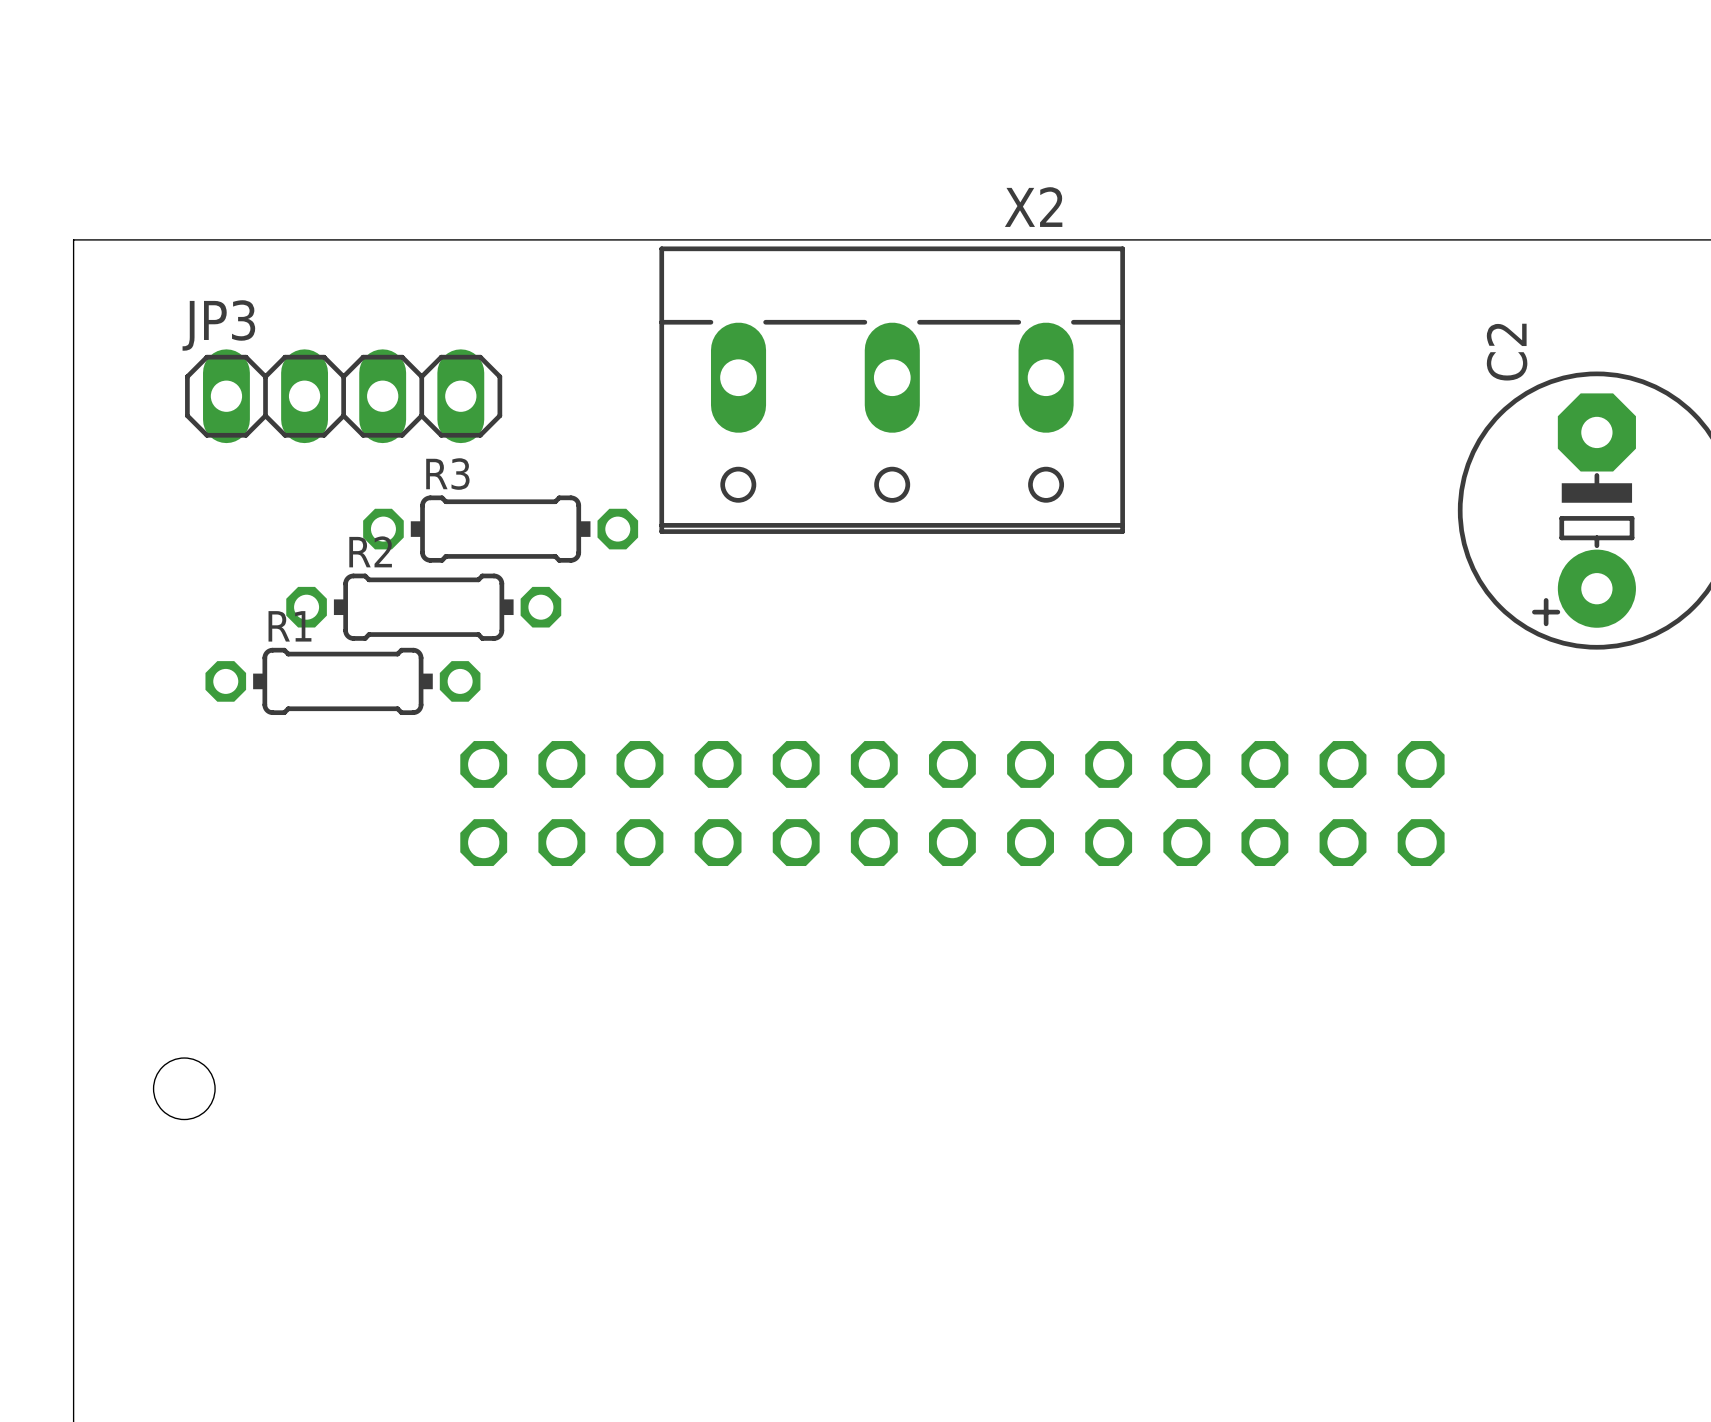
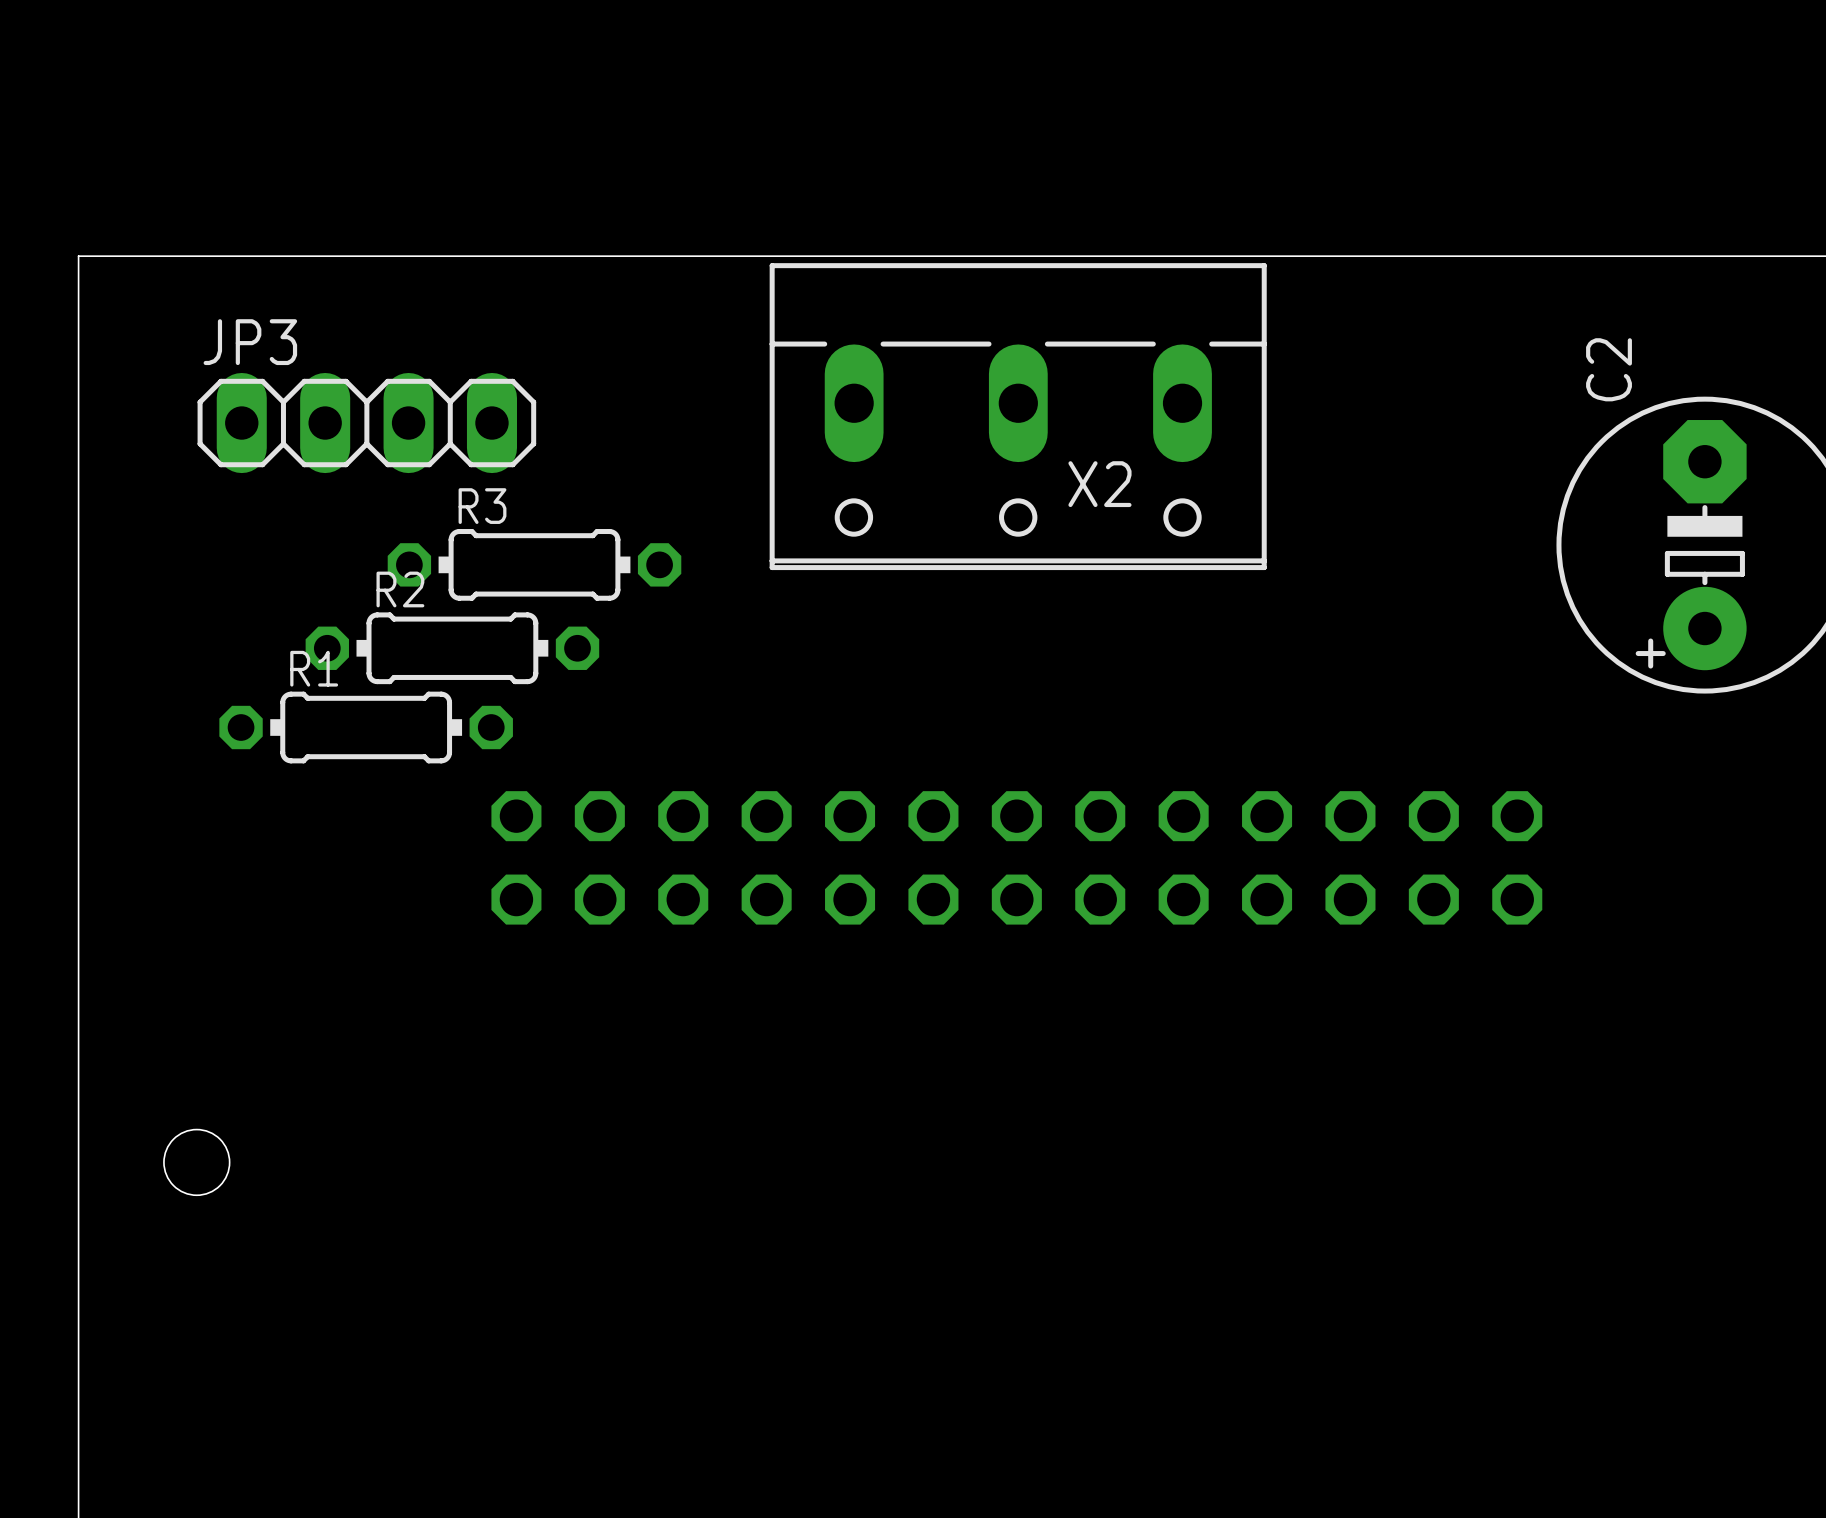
X2 name position: X2 (1033, 207) -> X2 (1099, 484)
X2 position: (892, 390) -> (1018, 416)

